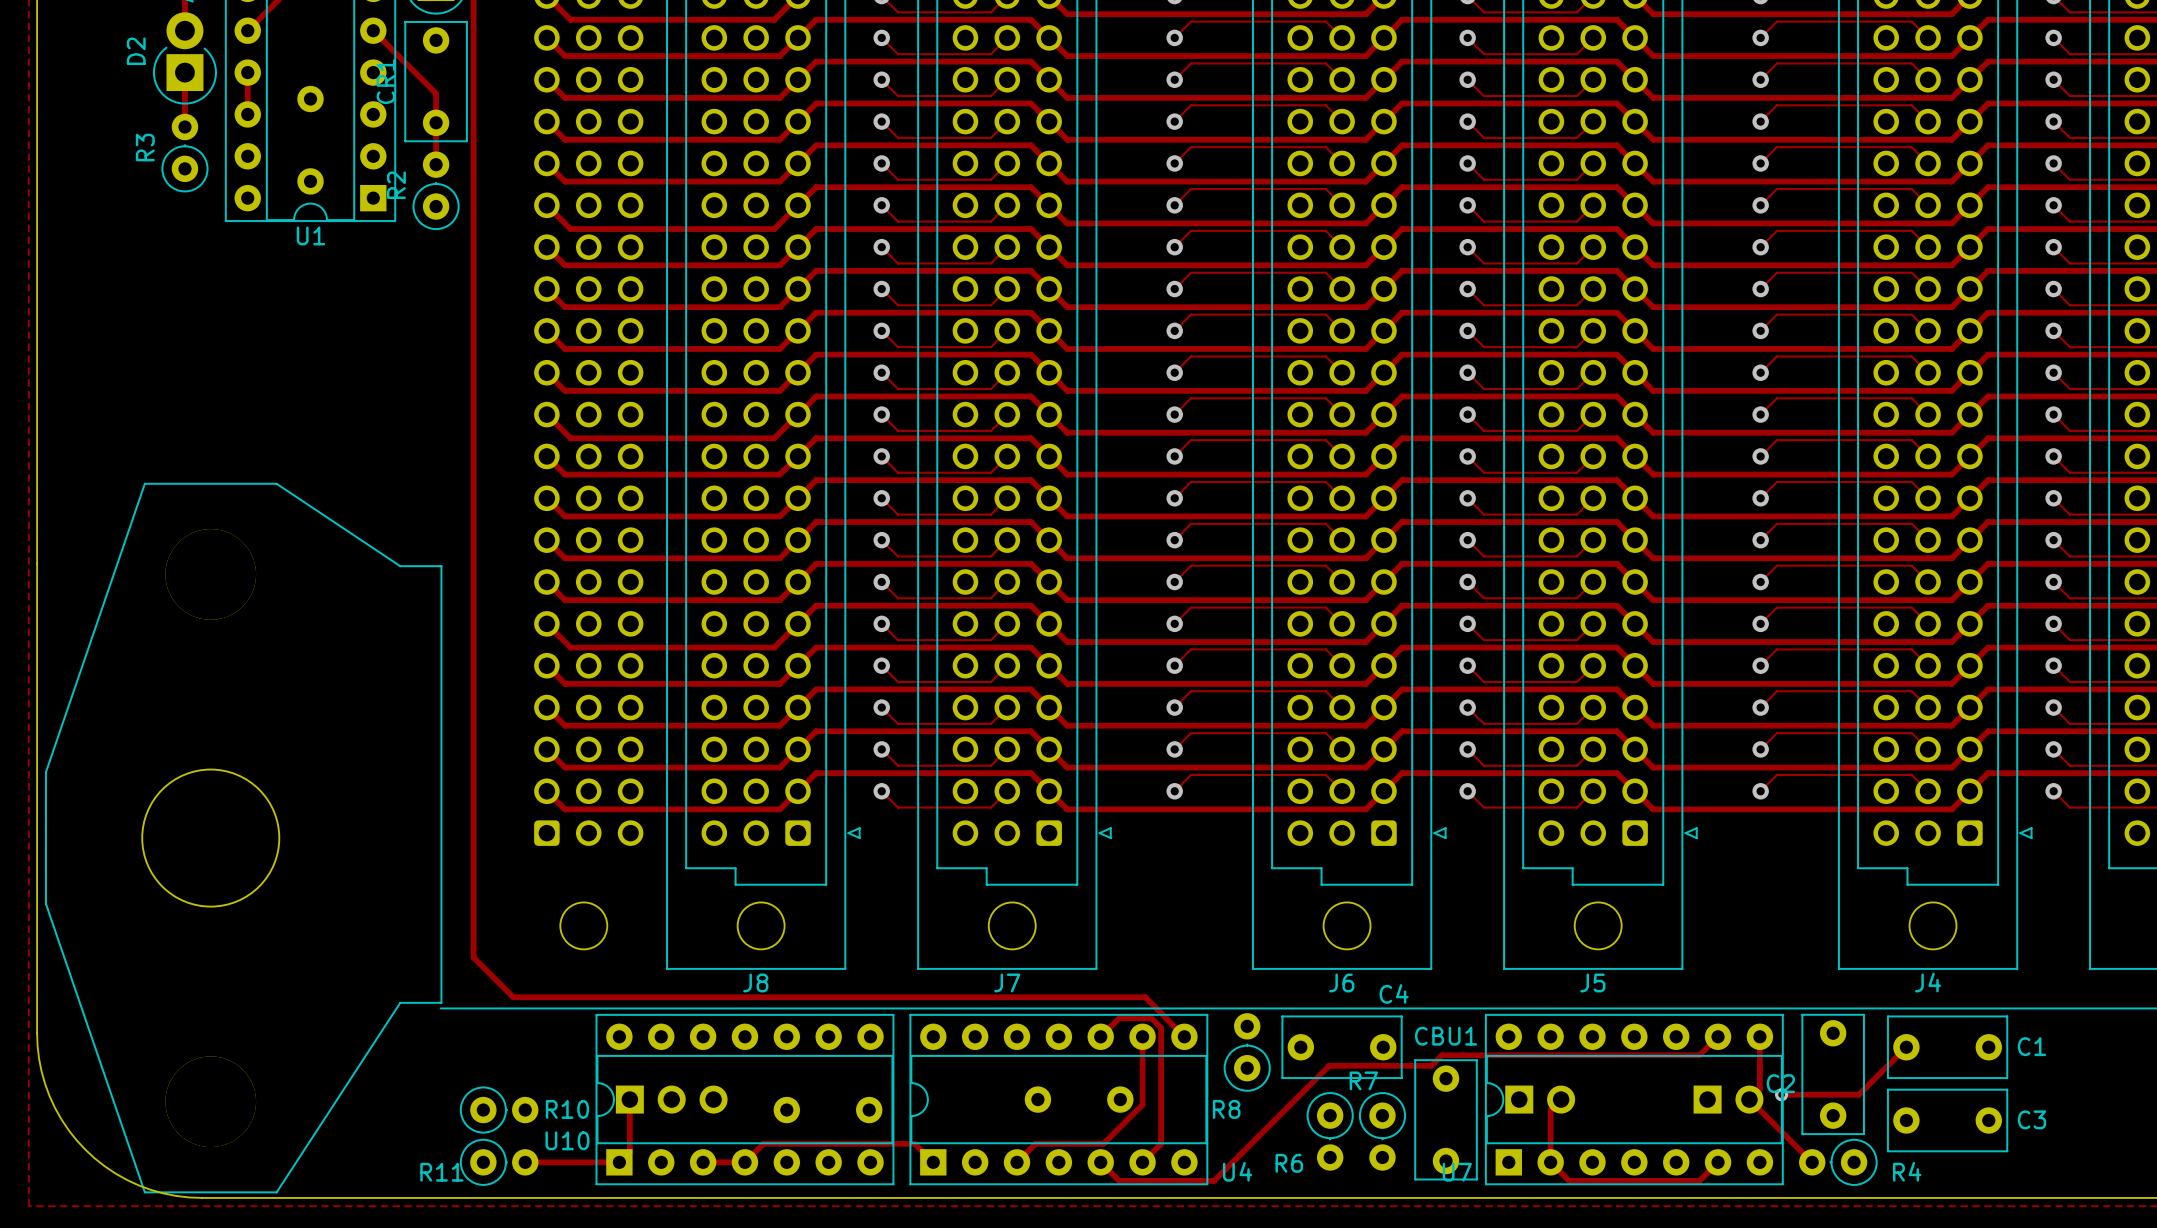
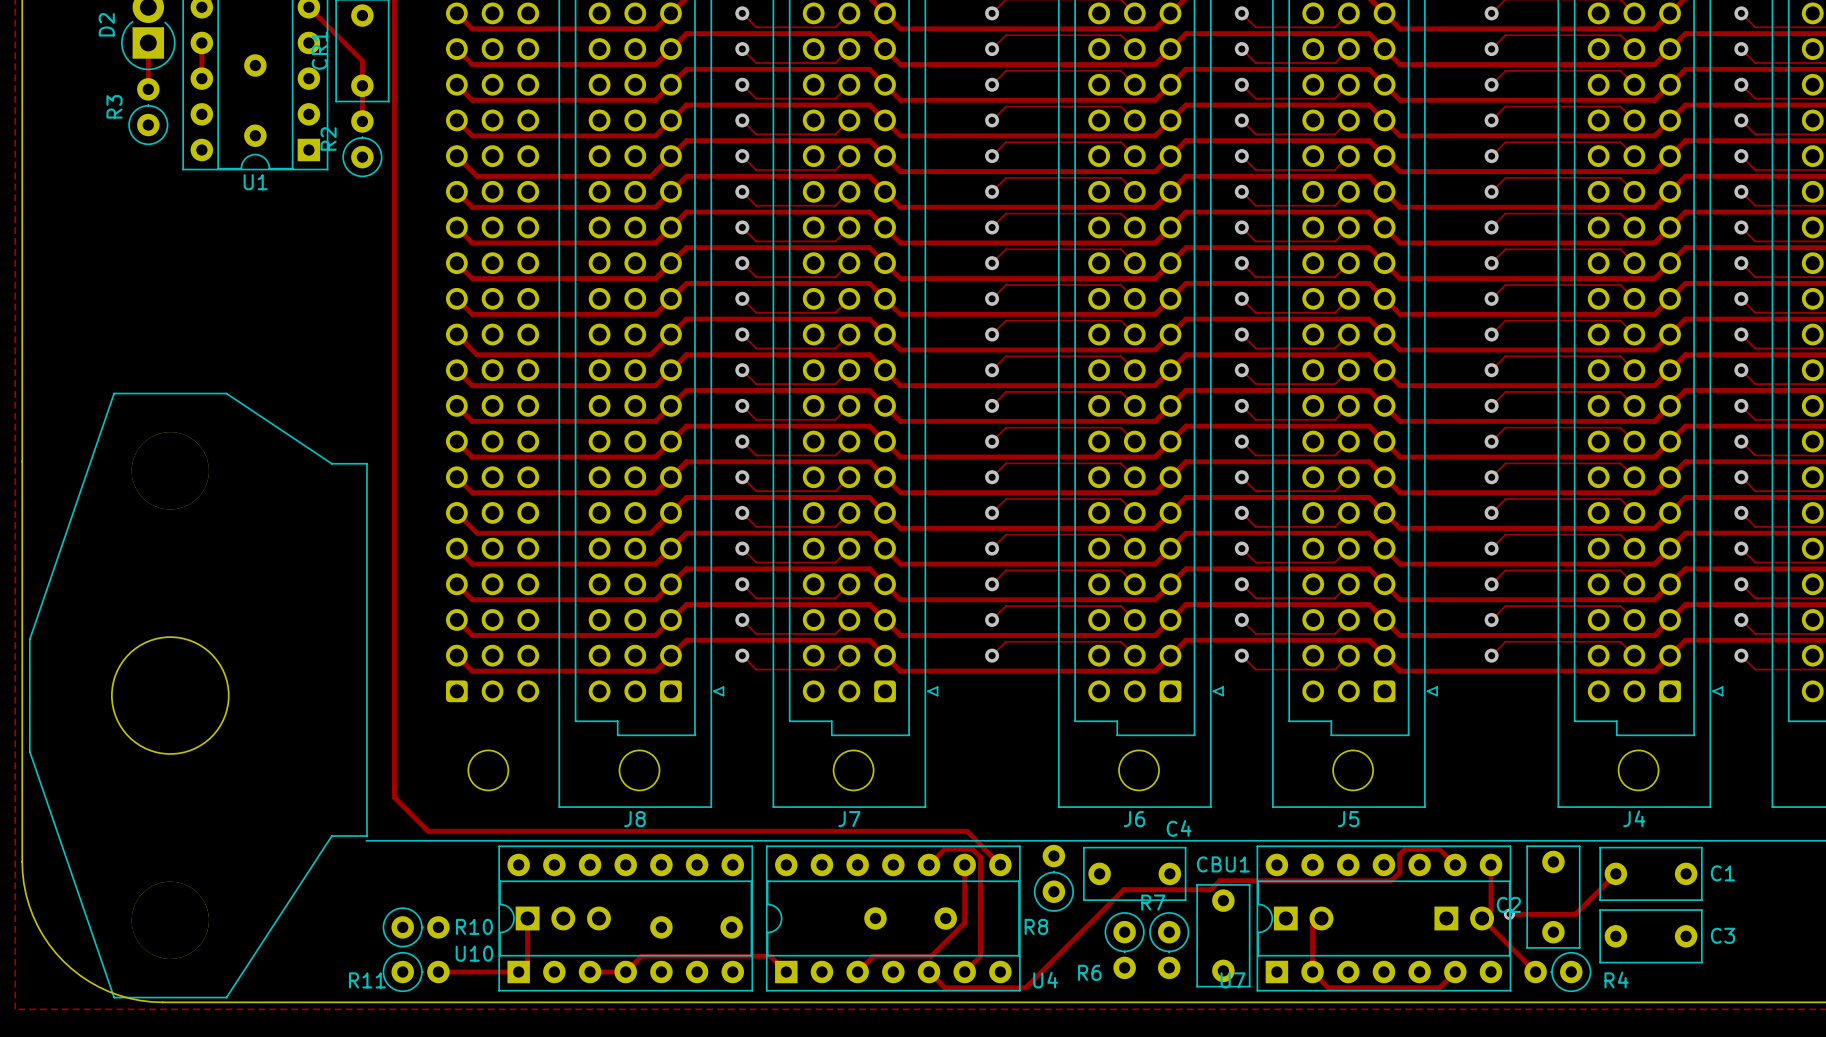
track: (1718, 1036) (1699, 1055) (1643, 1055) -> (1455, 864) (1439, 849) (1405, 849) (1399, 854) (1399, 872) (1391, 880)

